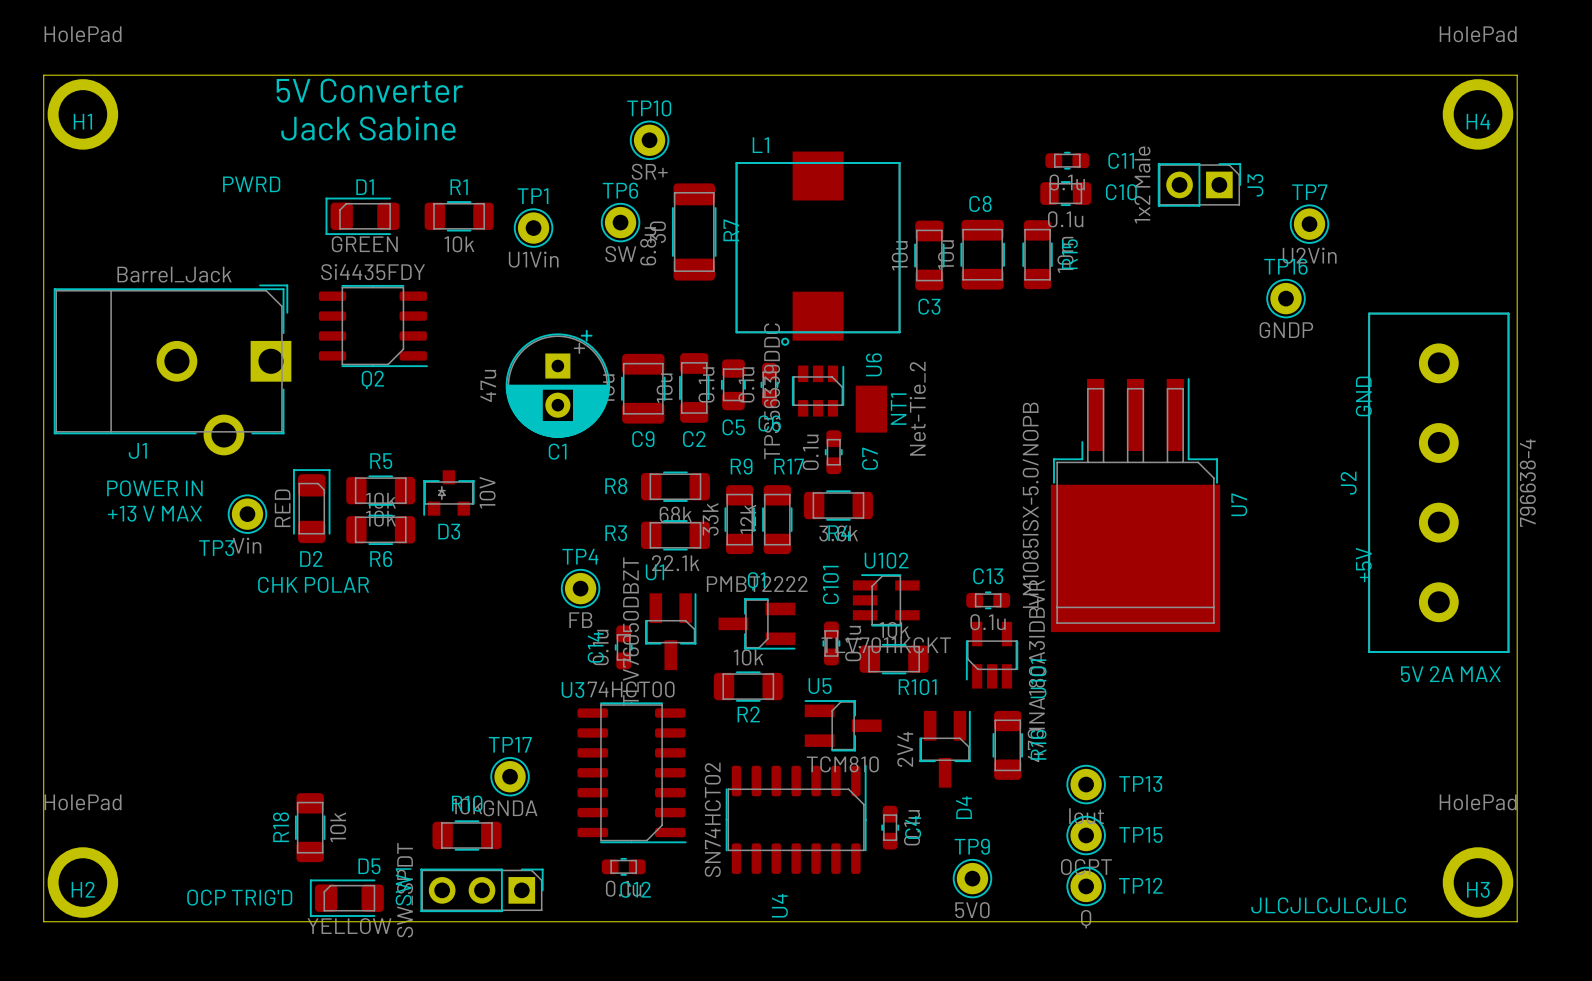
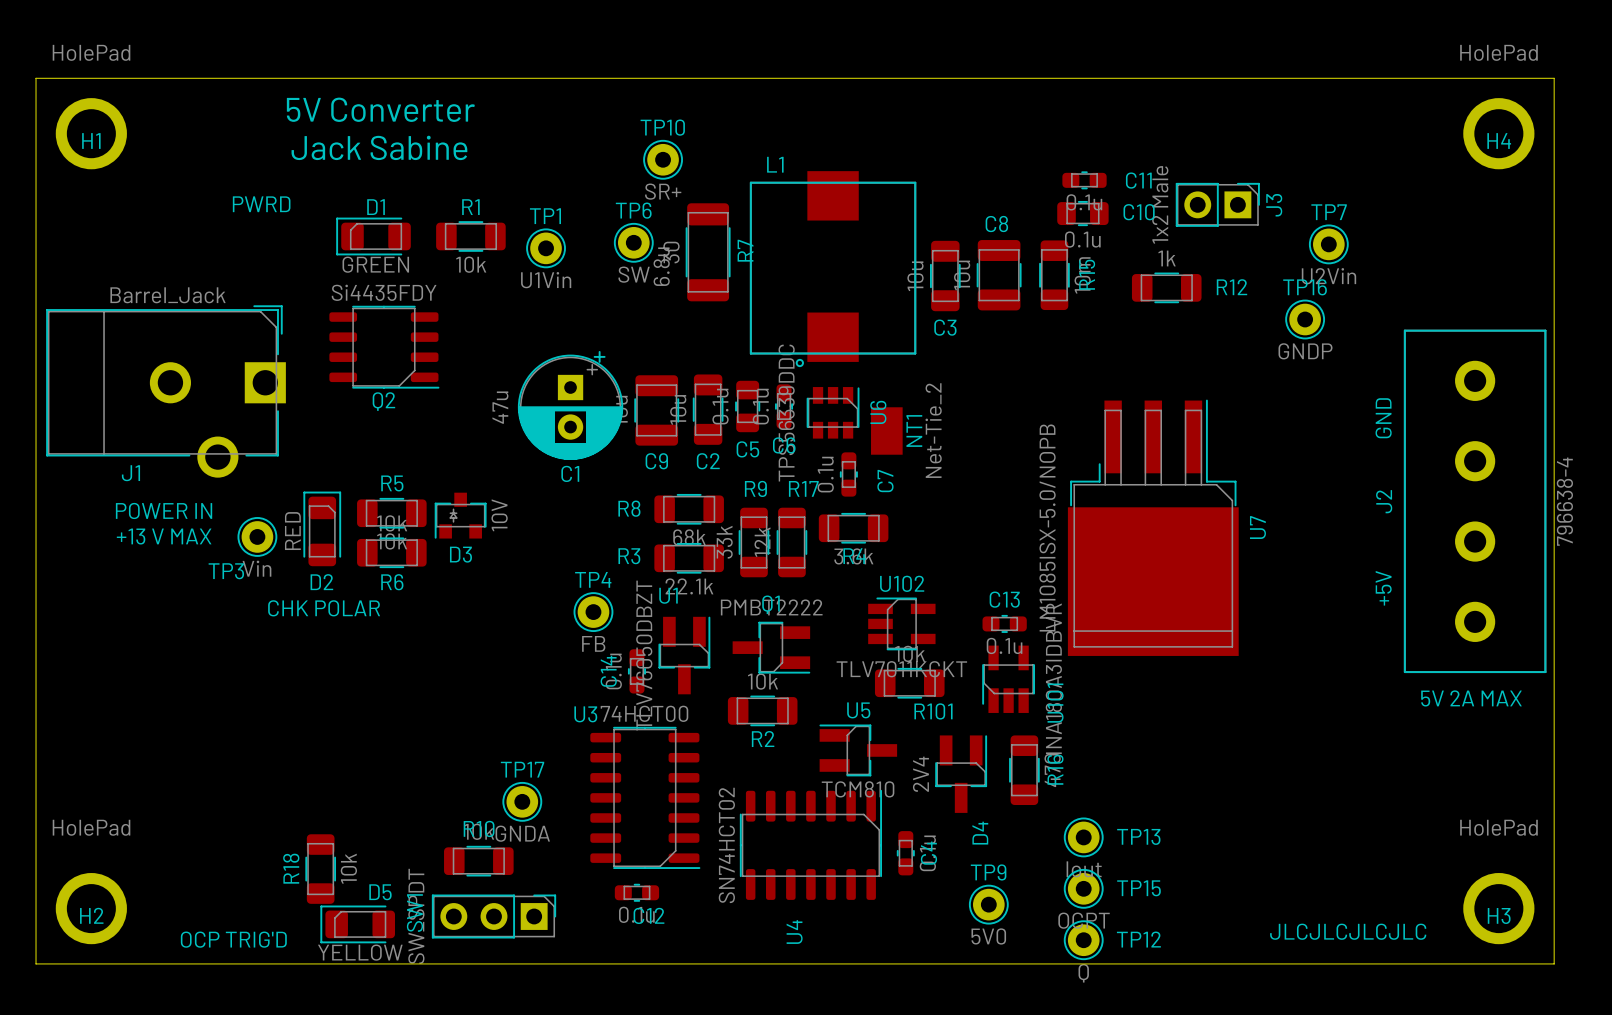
board edge: (43, 75) (43, 921) (1517, 921) (1517, 75) (43, 75) -> (36, 78) (36, 963) (1554, 963) (1554, 78) (36, 78)
R12: none -> 1k (1166, 287)
U6 name position: U6 (873, 364) -> U6 (878, 412)
J1 position: (172, 369) -> (166, 391)
J2 position: (1438, 482) -> (1475, 501)
C101: 0.1u (831, 643) -> none
U5 name position: U5 (820, 686) -> U5 (858, 710)
TP13 position: (1086, 784) -> (1083, 837)
R18 position: (310, 827) -> (320, 869)
TP15 position: (1086, 835) -> (1083, 888)
TP12 position: (1086, 886) -> (1083, 940)
text position: OCP TRIG'D (239, 897) -> OCP TRIG'D (233, 939)

